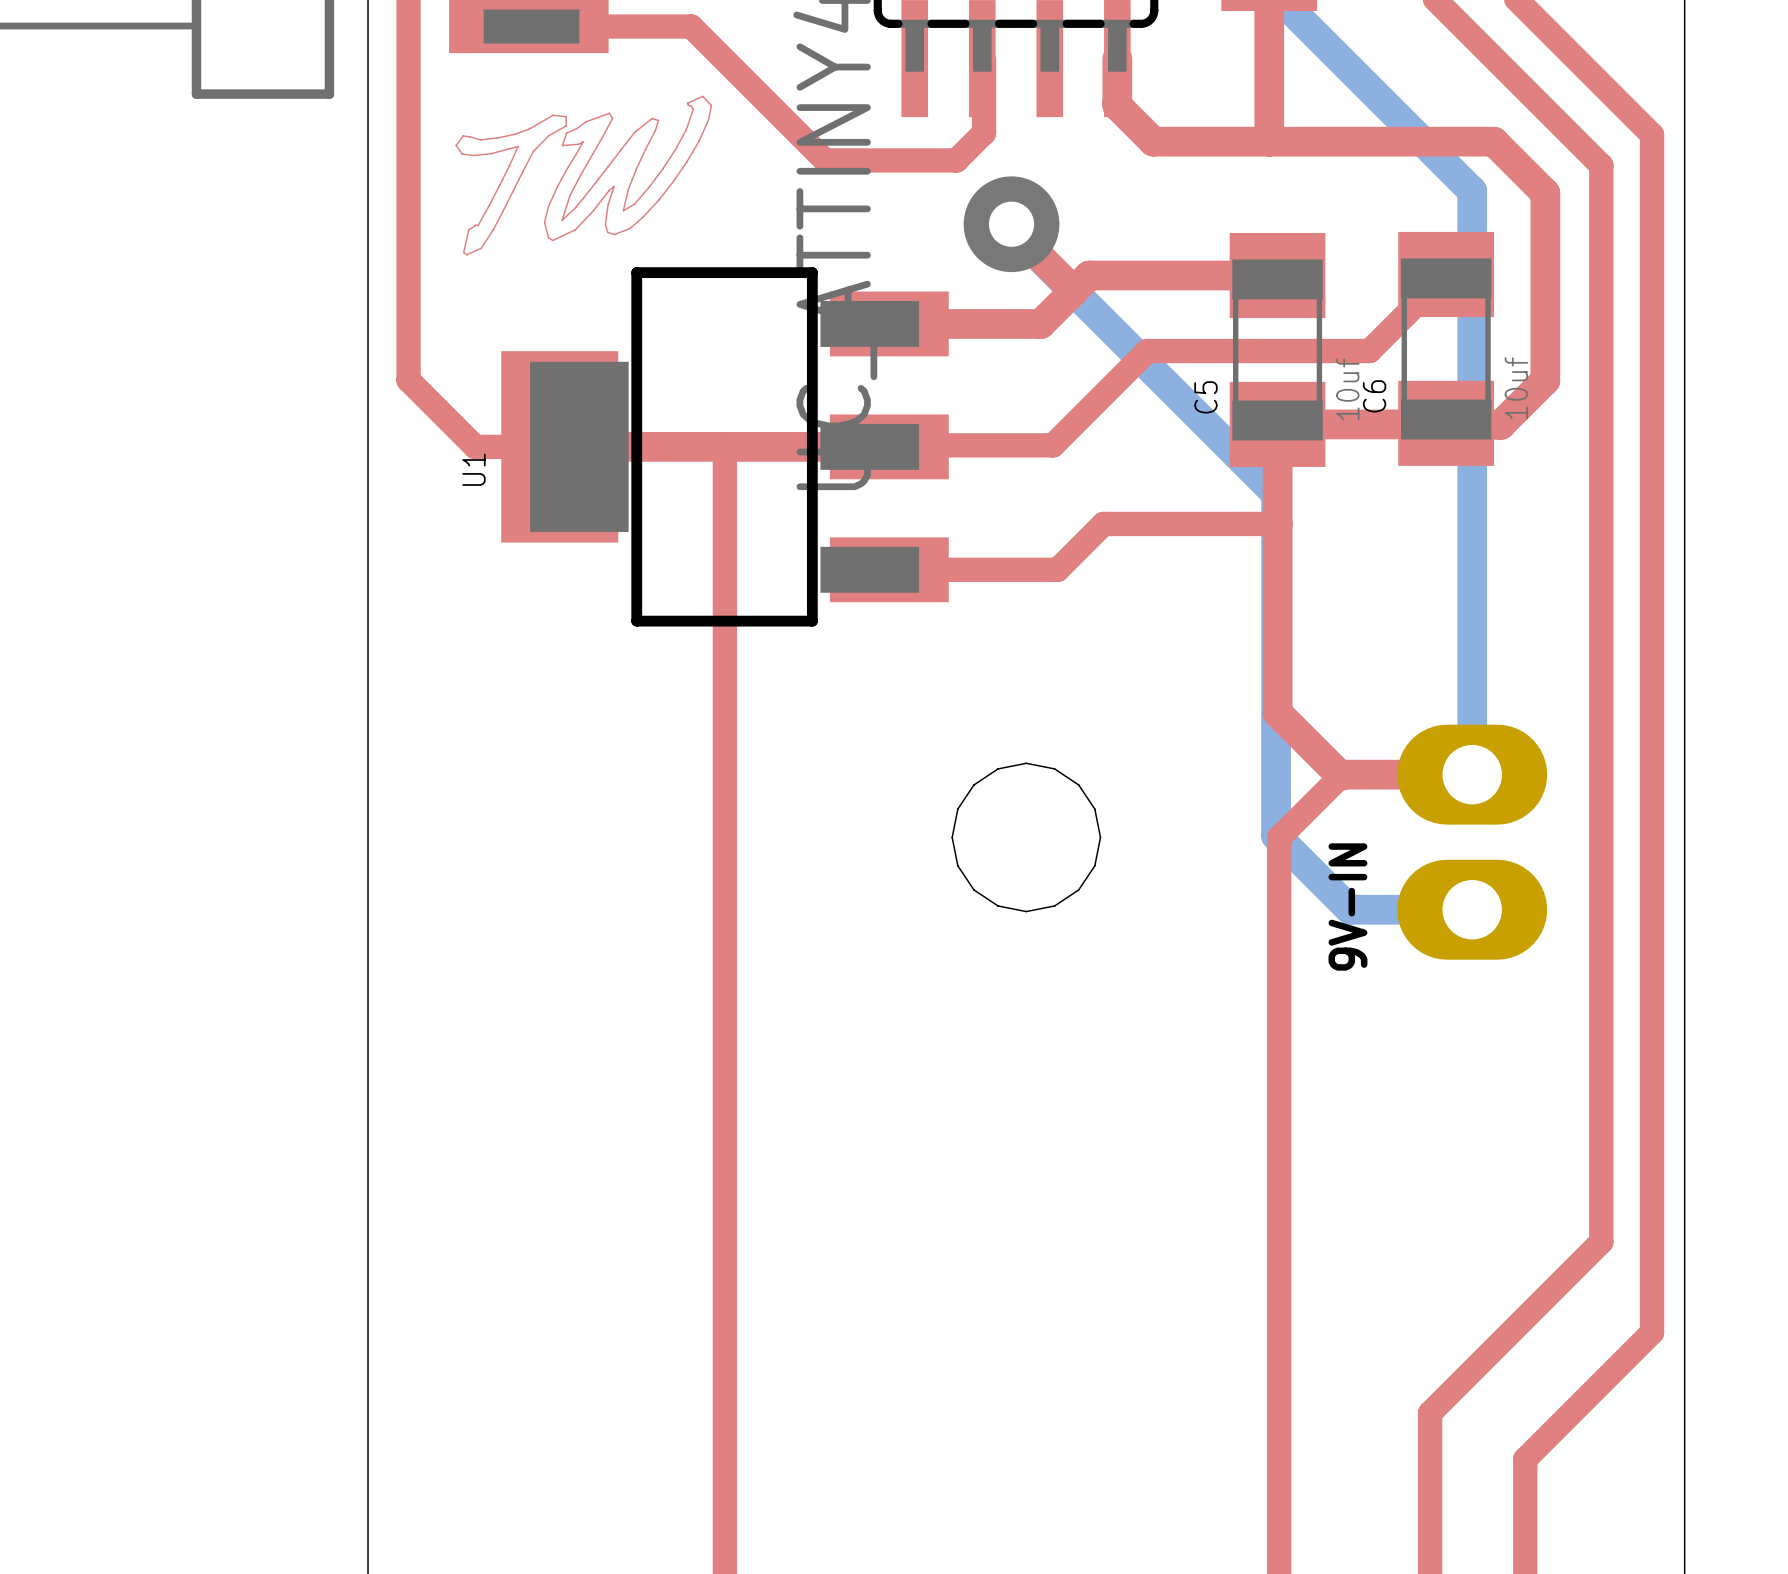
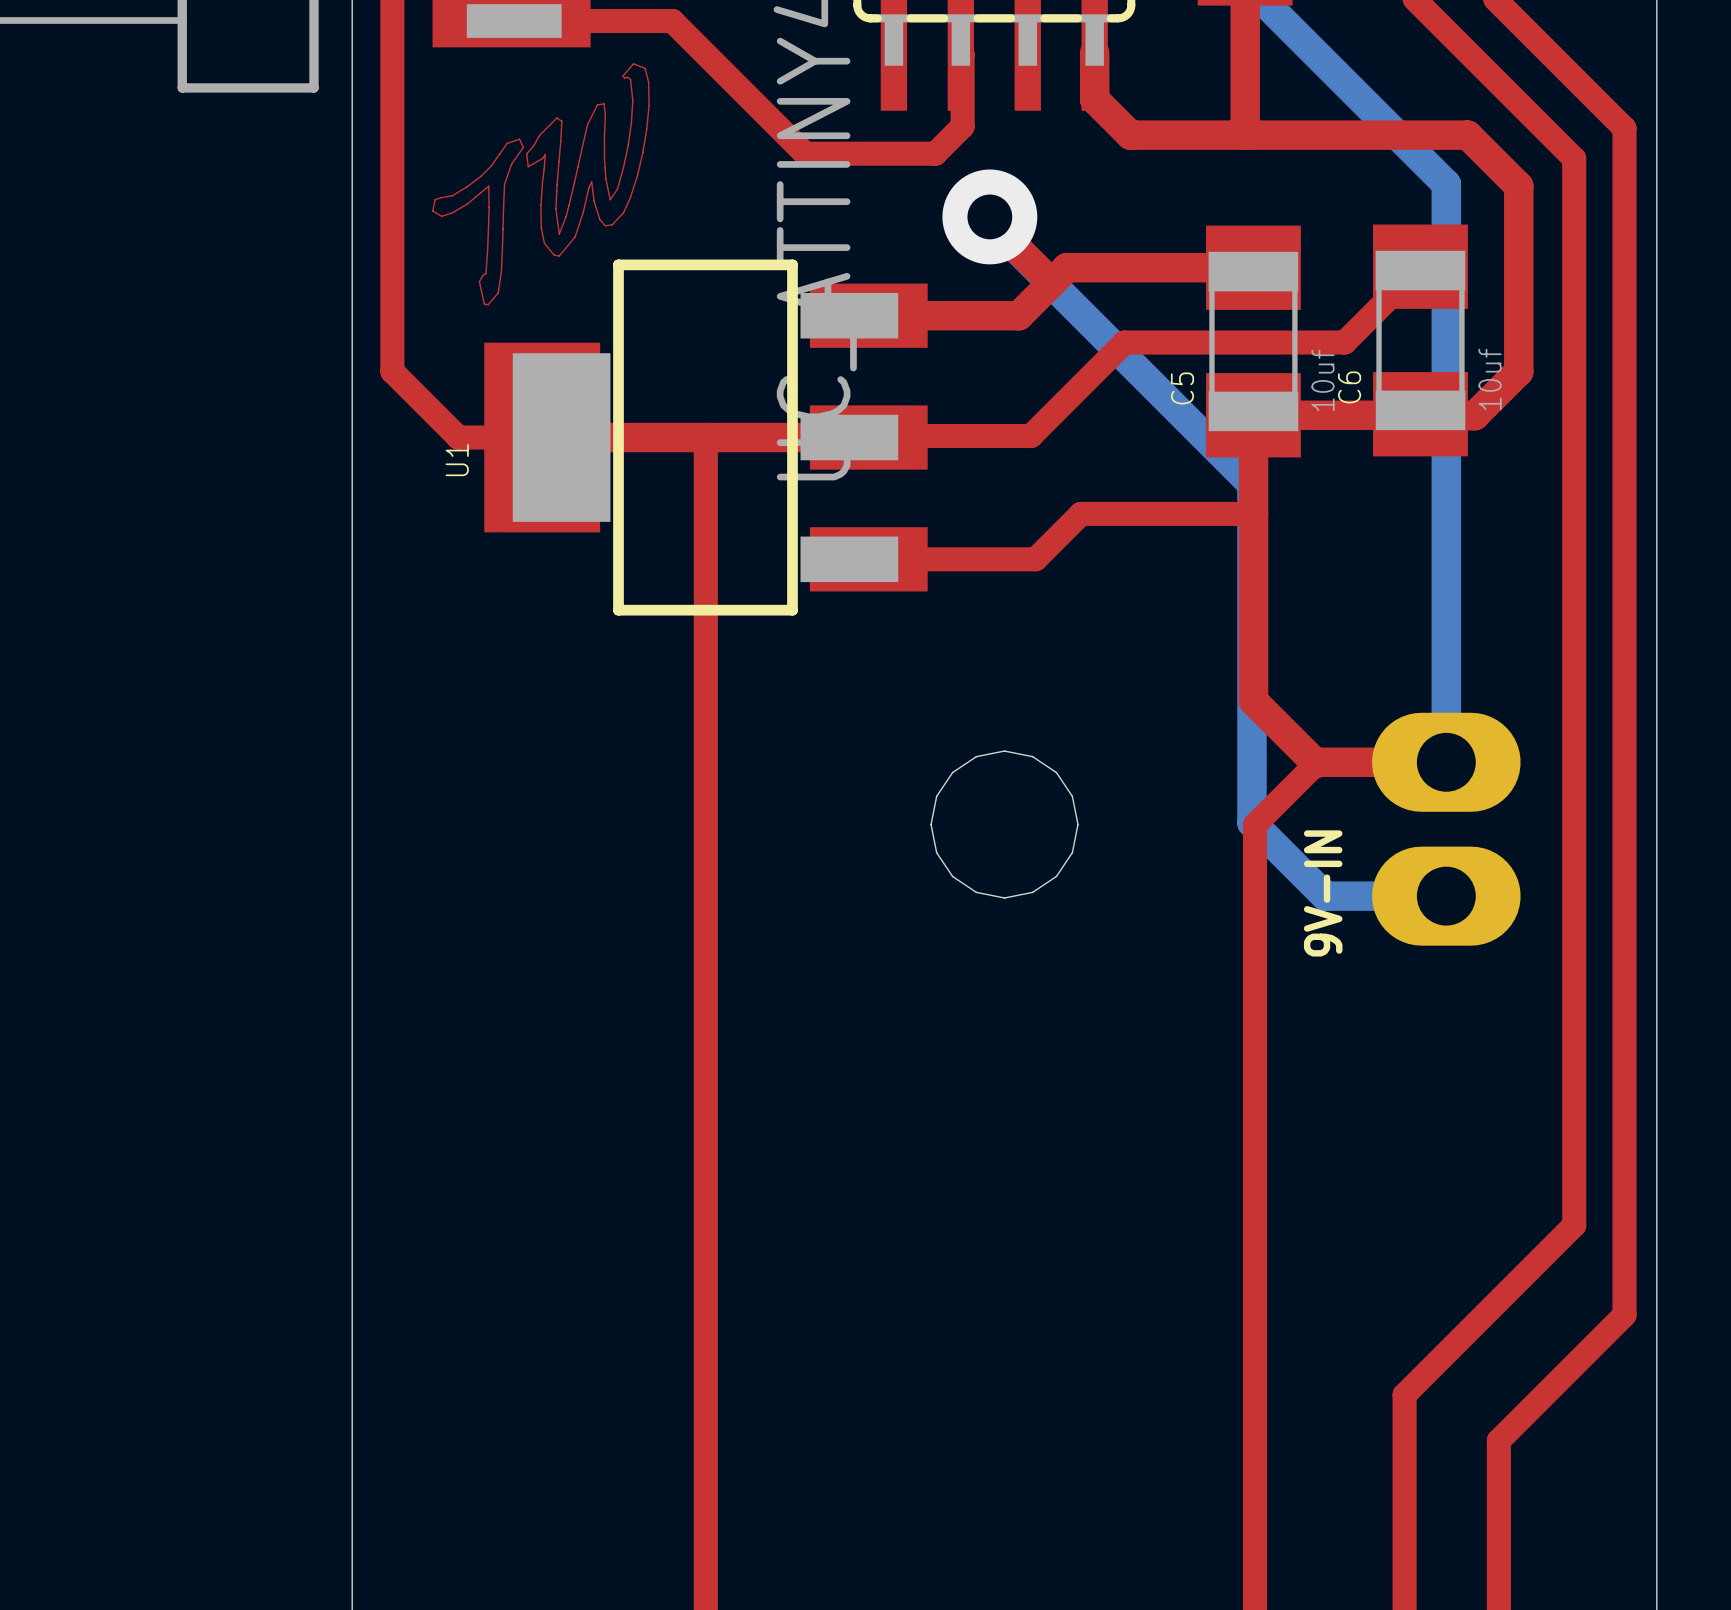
top track: (553, 115) (528, 129) (514, 134) (480, 139) (463, 135) (456, 145) (462, 154) (473, 155) (491, 153) (518, 146) (478, 225) (468, 229) (463, 252) (466, 254) (481, 248) (493, 230) (533, 151) (548, 135) (566, 125) (566, 116) (553, 115) -> none
top track: none -> (519, 139) (523, 147) (511, 163) (504, 184) (501, 271) (498, 292) (488, 304) (484, 304) (479, 281) (485, 273) (488, 186) (467, 203) (452, 212) (441, 216) (432, 211) (435, 199) (452, 195) (467, 186) (491, 166) (507, 143) (519, 139)
top track: (654, 179) (686, 129) (693, 109) (687, 103) (702, 96) (711, 105) (708, 119) (698, 141) (673, 181) (642, 217) (630, 228) (614, 234) (607, 232) (605, 224) (607, 205) (613, 186) (575, 229) (552, 240) (548, 237) (544, 222) (548, 206) (557, 186) (583, 141) (579, 144) (562, 145) (566, 133) (585, 121) (609, 113) (612, 118) (569, 195) (562, 220) (582, 198) (634, 132) (652, 118) (658, 120) (628, 189) (623, 210) (634, 204) (654, 179) -> (633, 63) (623, 75) (630, 79) (632, 100) (628, 145) (617, 189) (610, 199) (605, 178) (604, 103) (597, 104) (587, 124) (568, 205) (559, 234) (555, 208) (561, 121) (556, 118) (539, 135) (526, 153) (528, 166) (542, 158) (545, 154) (541, 227) (544, 243) (554, 255) (559, 256) (575, 236) (591, 181) (594, 201) (599, 219) (605, 225) (612, 224) (623, 212) (630, 197) (642, 152) (649, 105) (648, 82) (645, 68) (633, 63)

